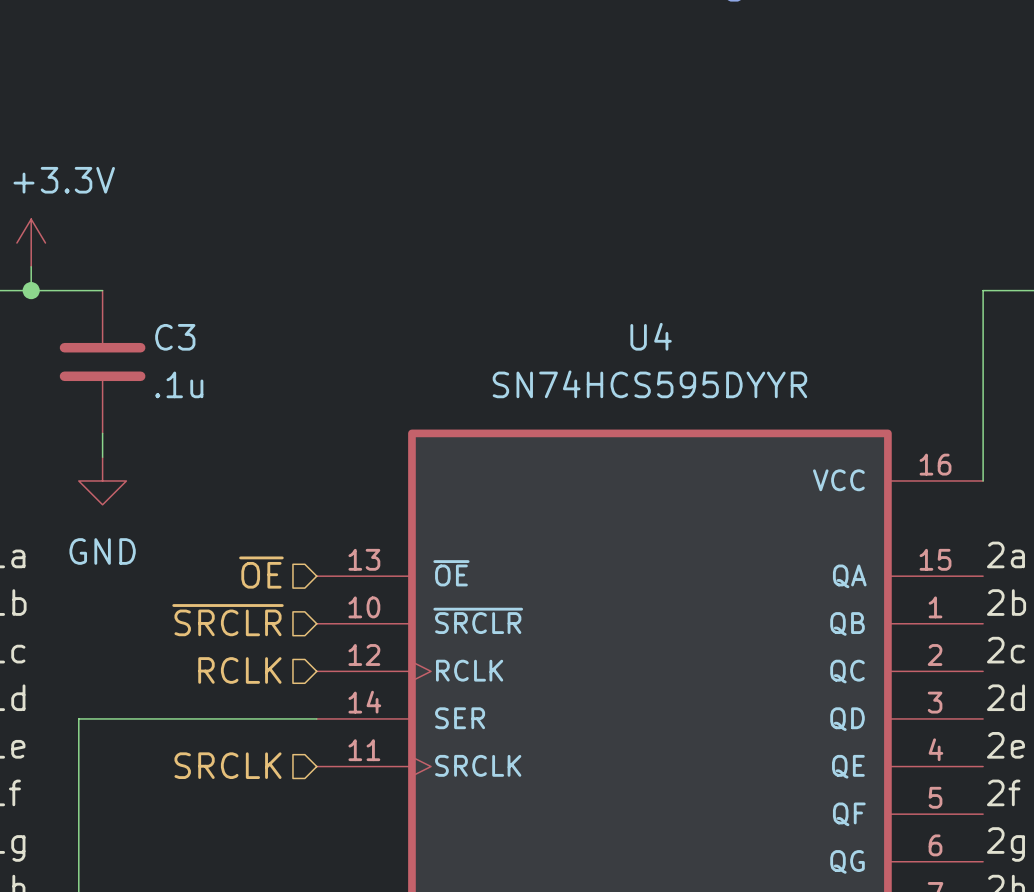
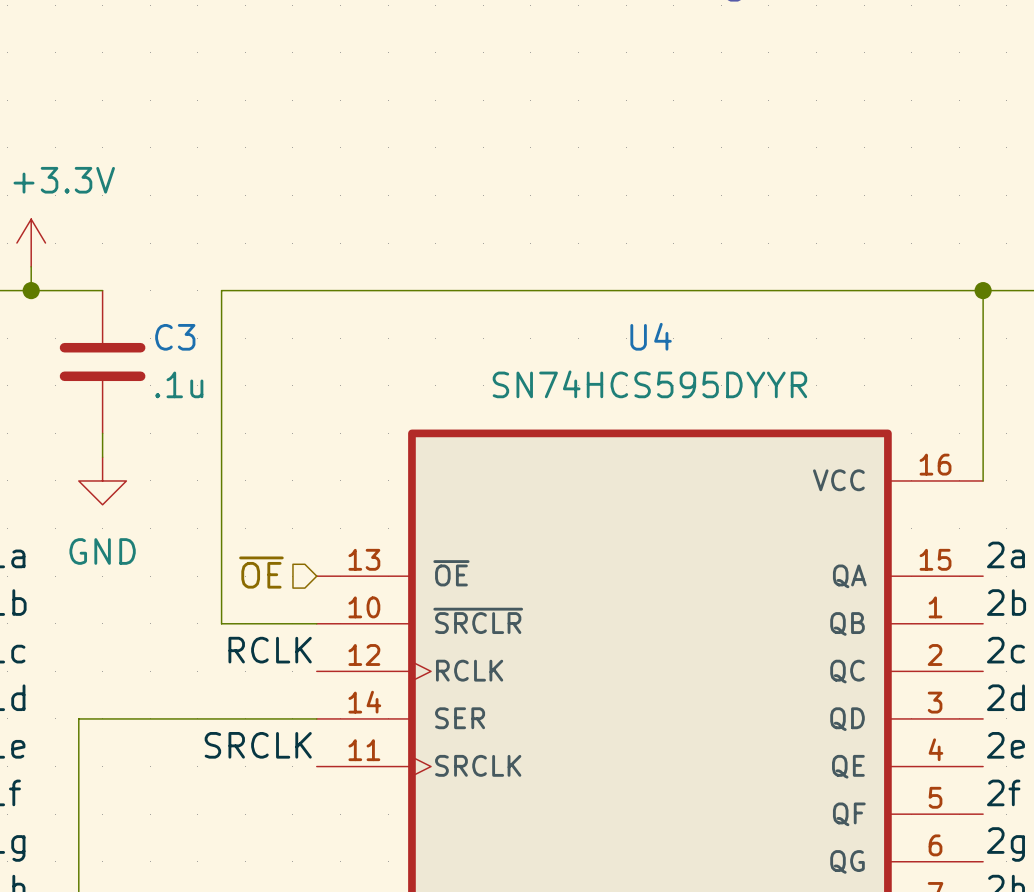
wire: none -> (983, 290) (221, 290) (221, 623) (316, 623)
junction: none -> (983, 290)
hierarchical label: ~{SRCLR} (228, 620) -> none
label: none -> RCLK (270, 650)
hierarchical label: RCLK (239, 670) -> none
label: none -> SRCLK (258, 745)
hierarchical label: SRCLK (228, 765) -> none

